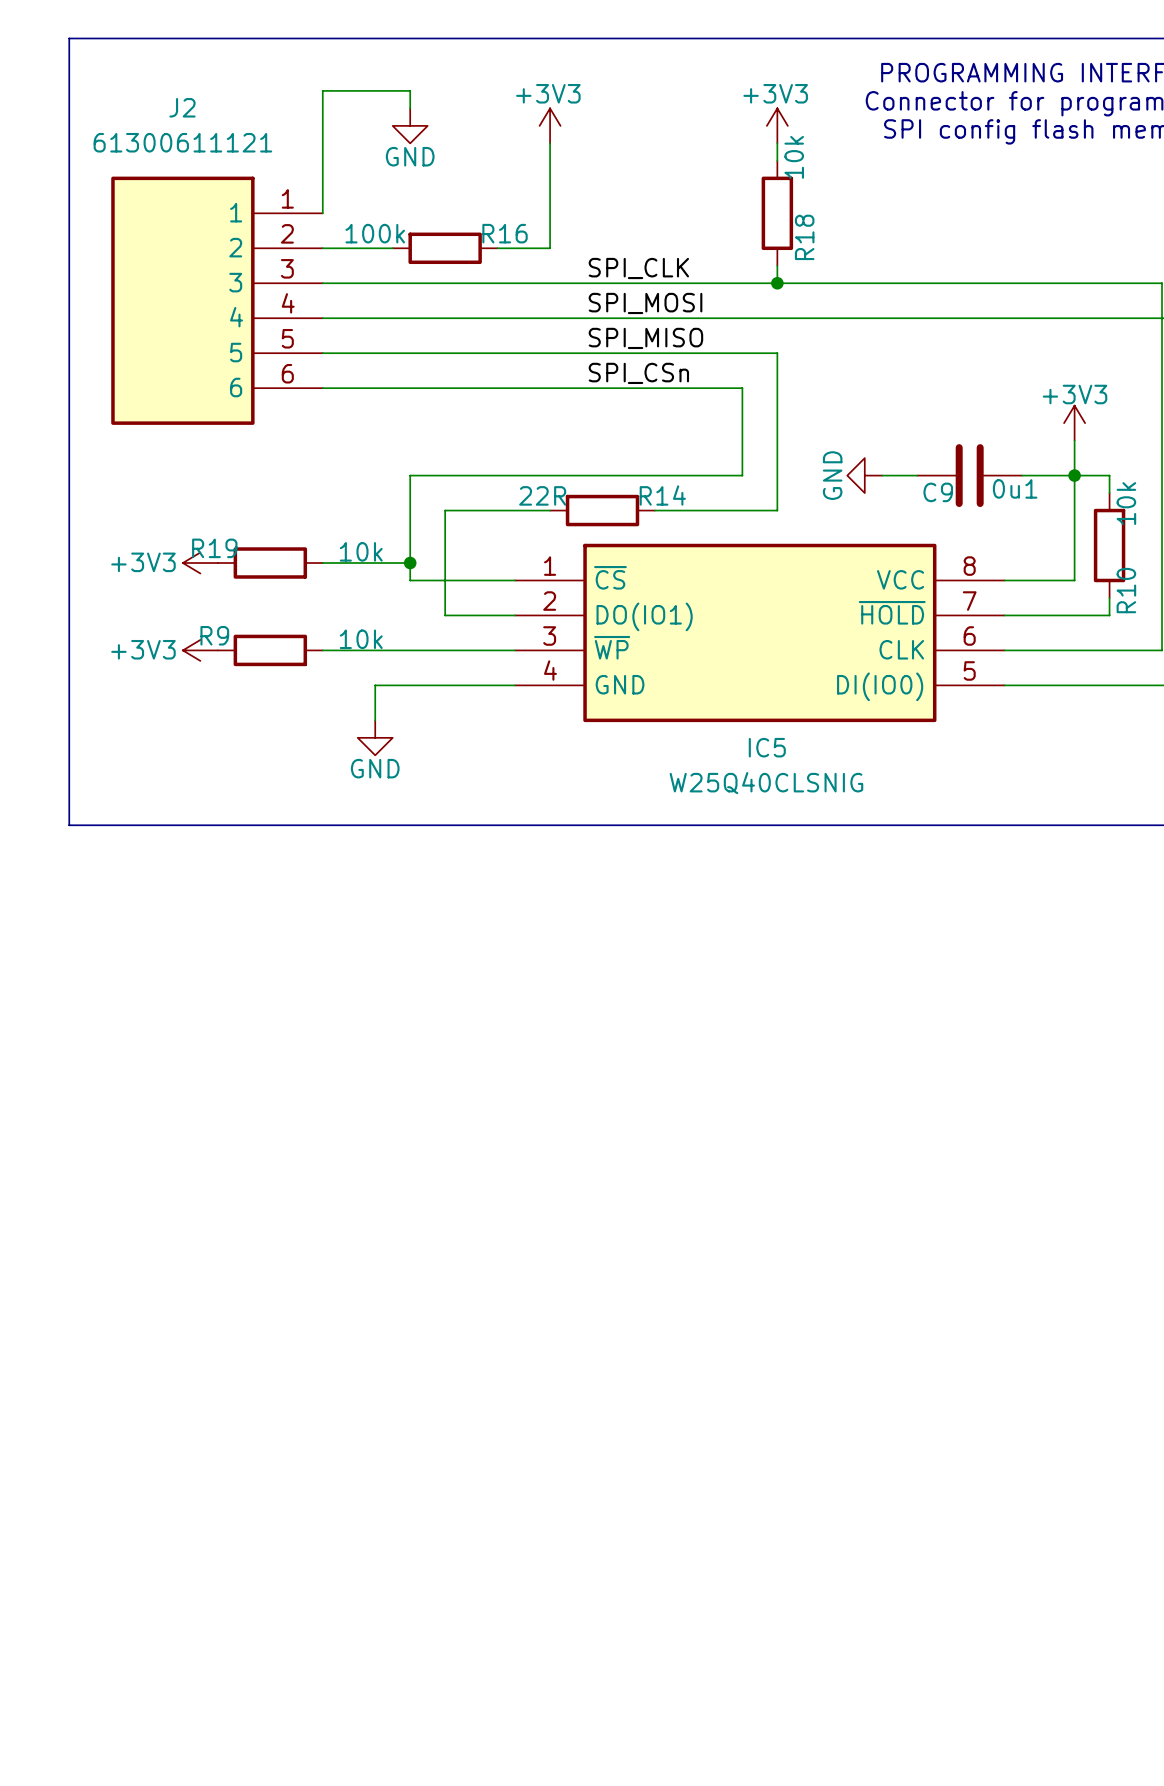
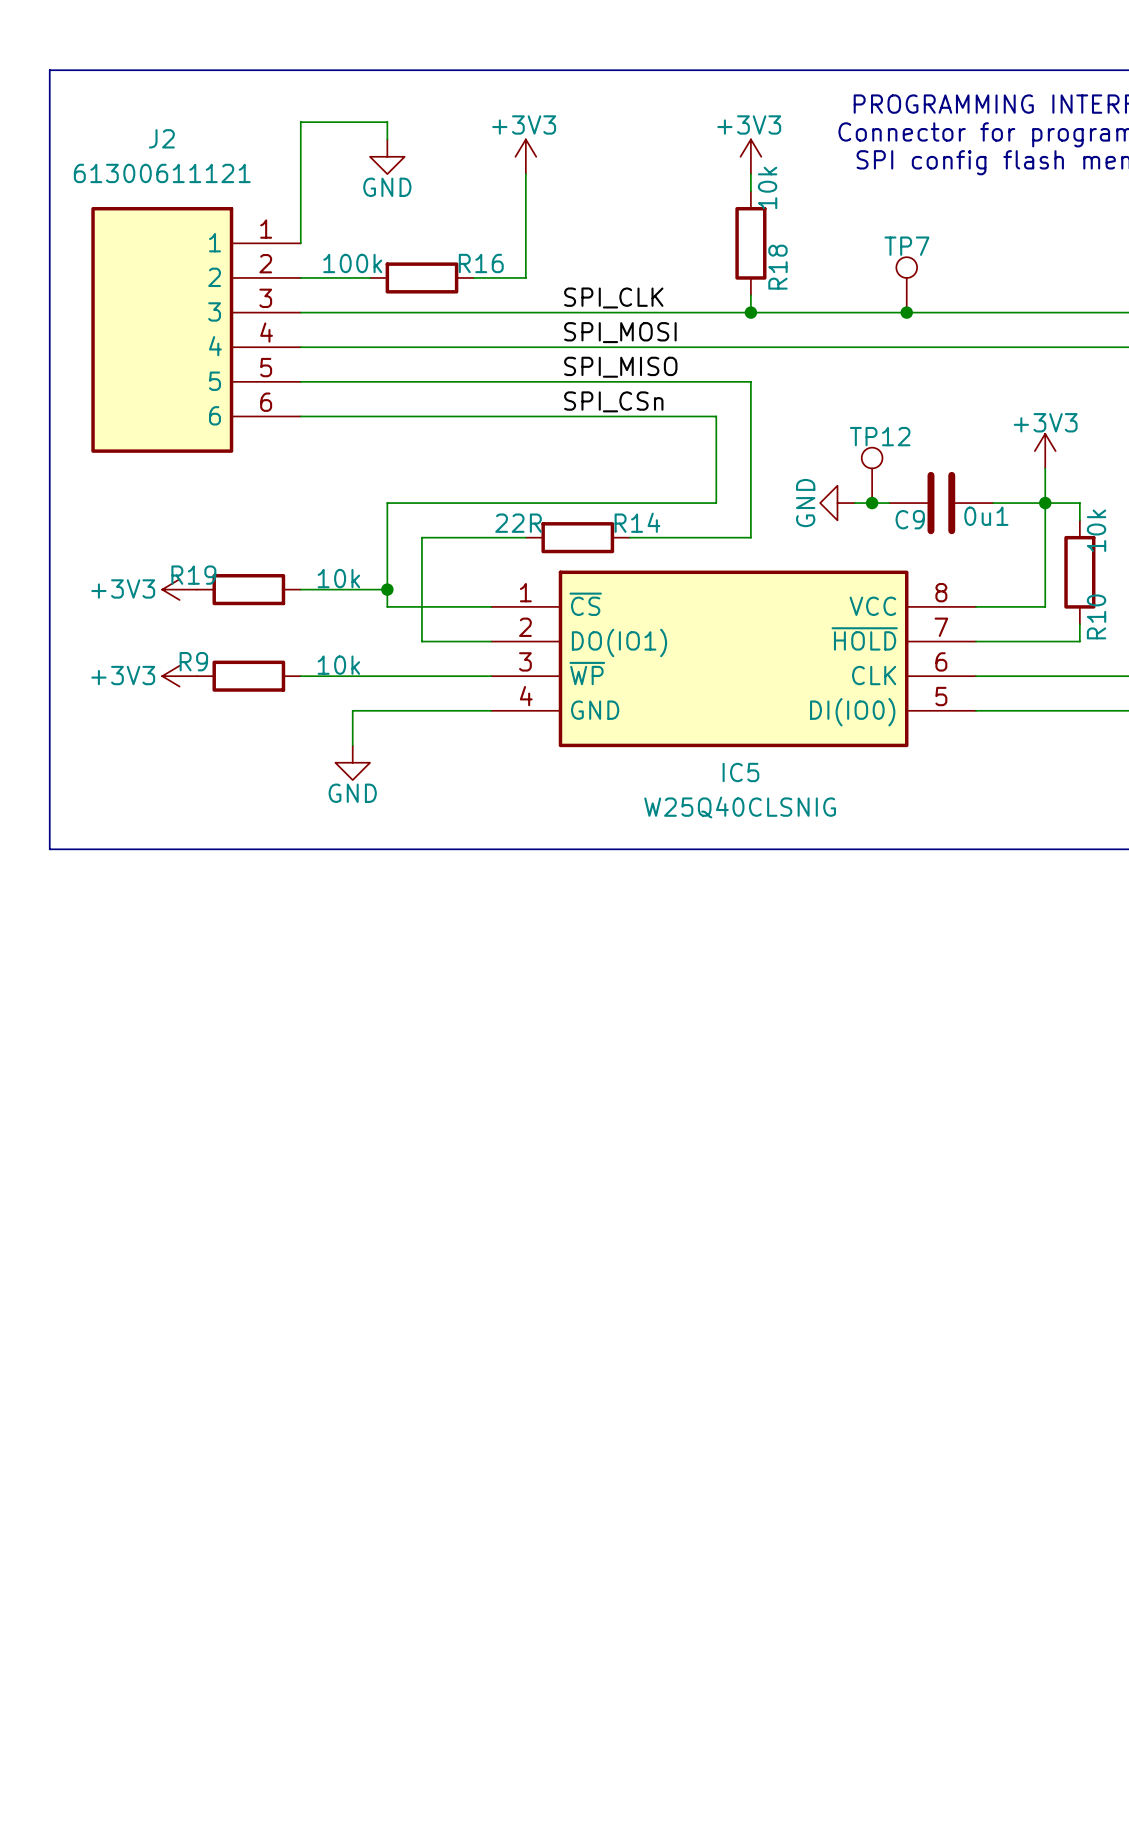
TP7: none -> (906, 284)
junction: none -> (906, 312)
TP12: none -> (872, 475)
junction: none -> (872, 503)

